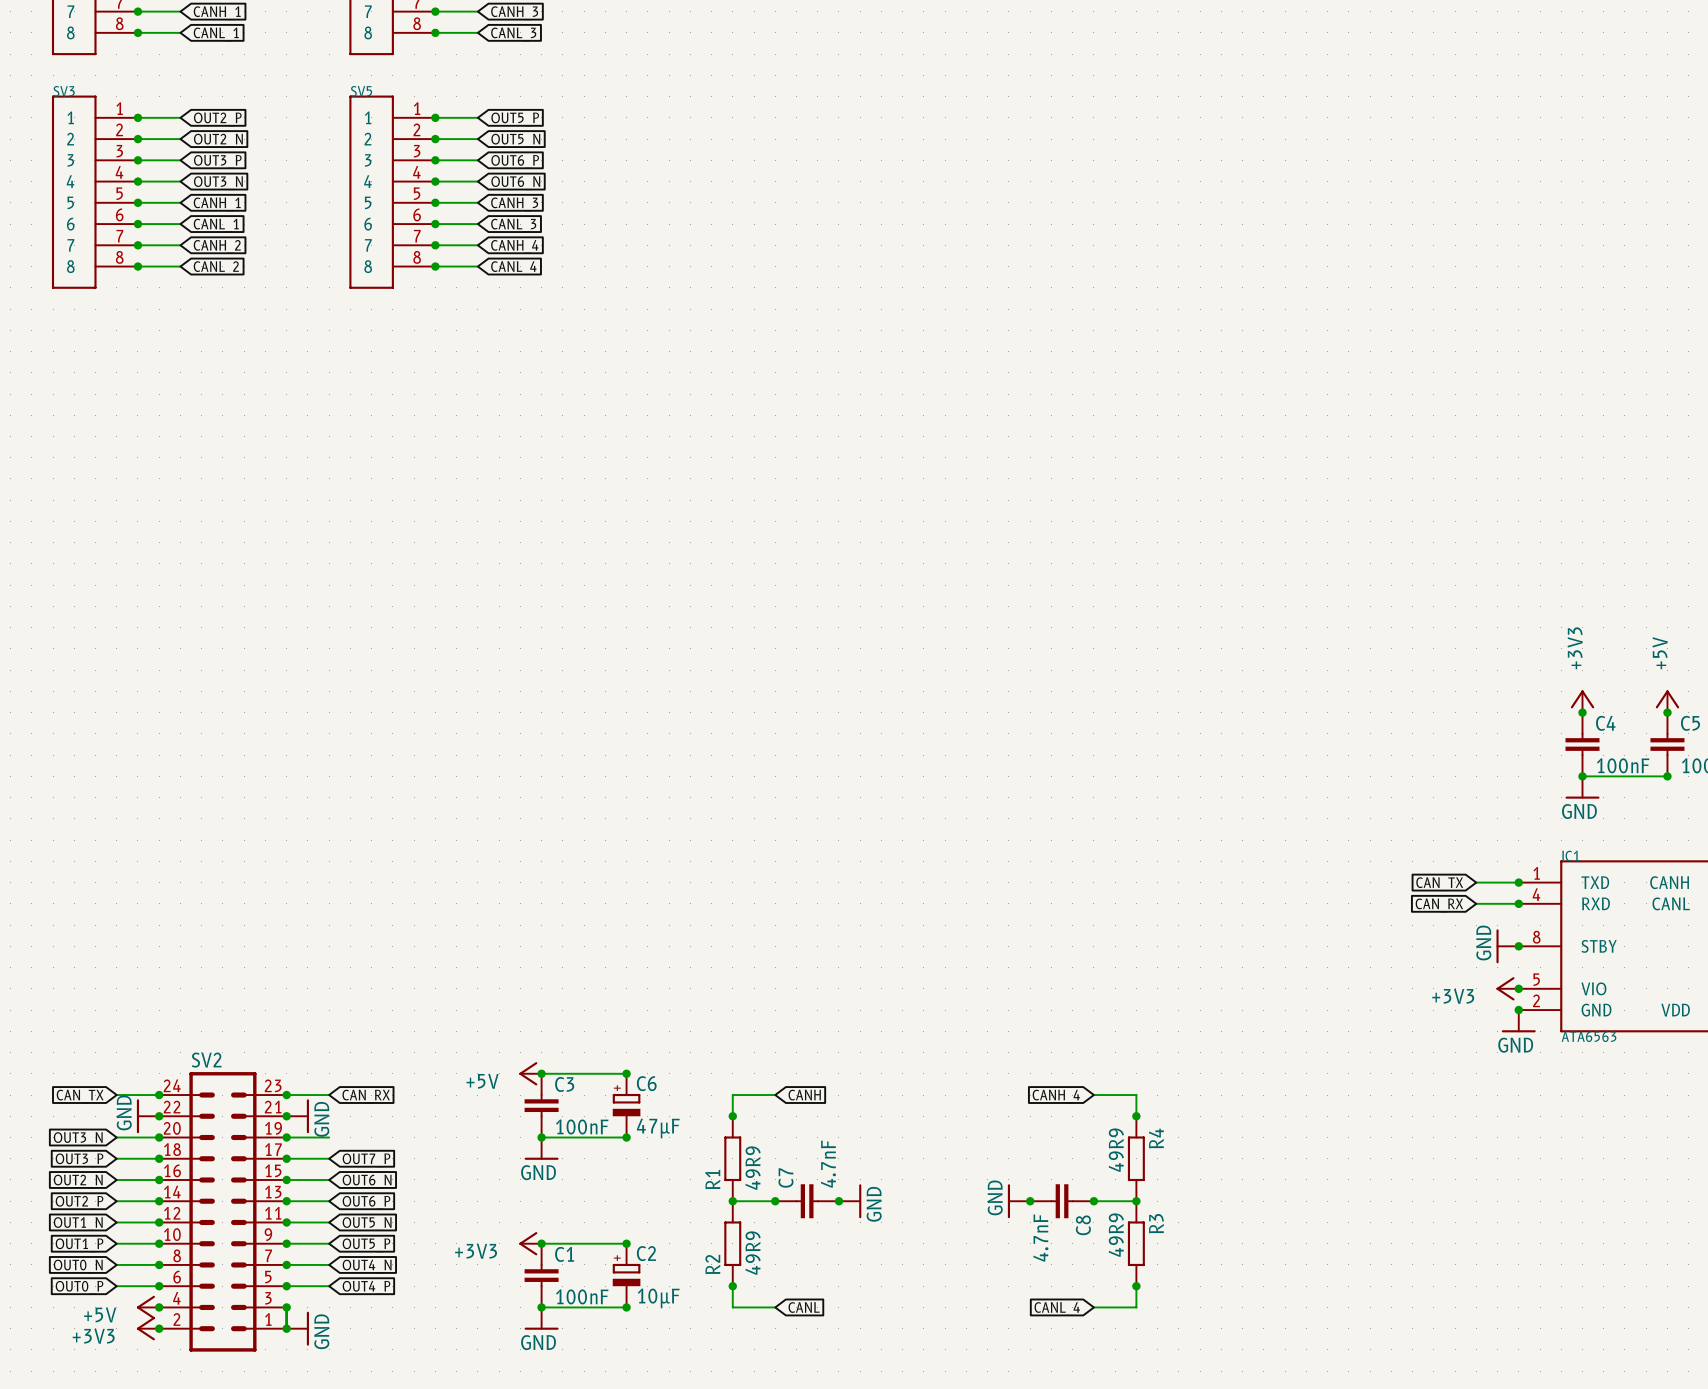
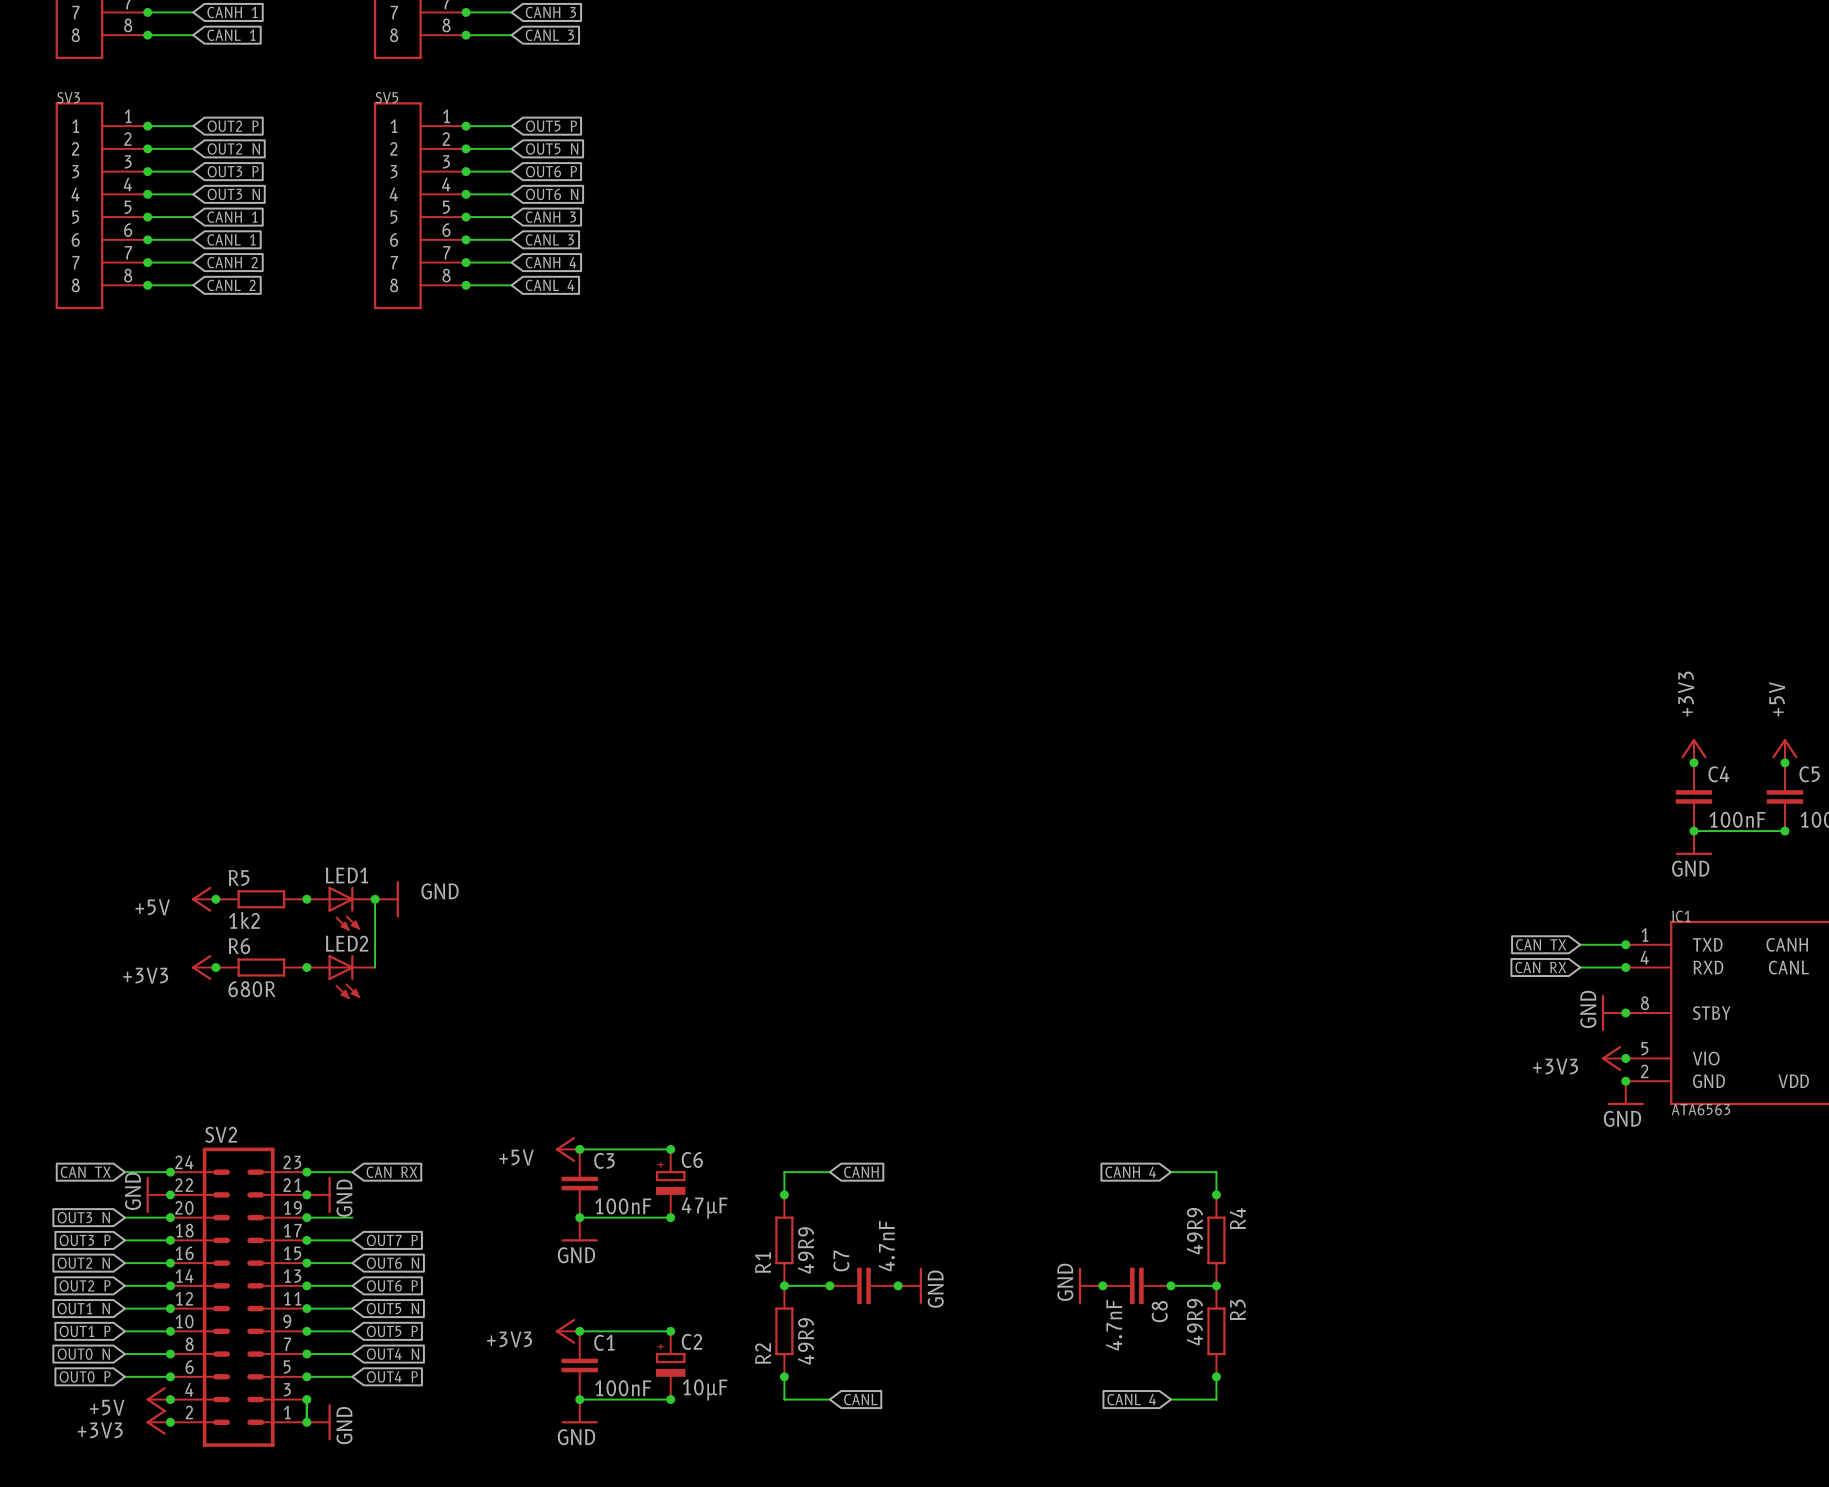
power symbol: none -> +5V (203, 899)
junction: none -> (215, 899)
R5: none -> 1k2 (261, 899)
junction: none -> (306, 899)
wire: none -> (375, 899) (375, 967)
junction: none -> (375, 899)
power symbol: none -> GND (387, 899)
LED1: none -> (340, 908)
power symbol: none -> +3V3 (203, 967)
junction: none -> (215, 967)
R6: none -> 680R (261, 967)
junction: none -> (306, 967)
LED2: none -> (340, 976)

